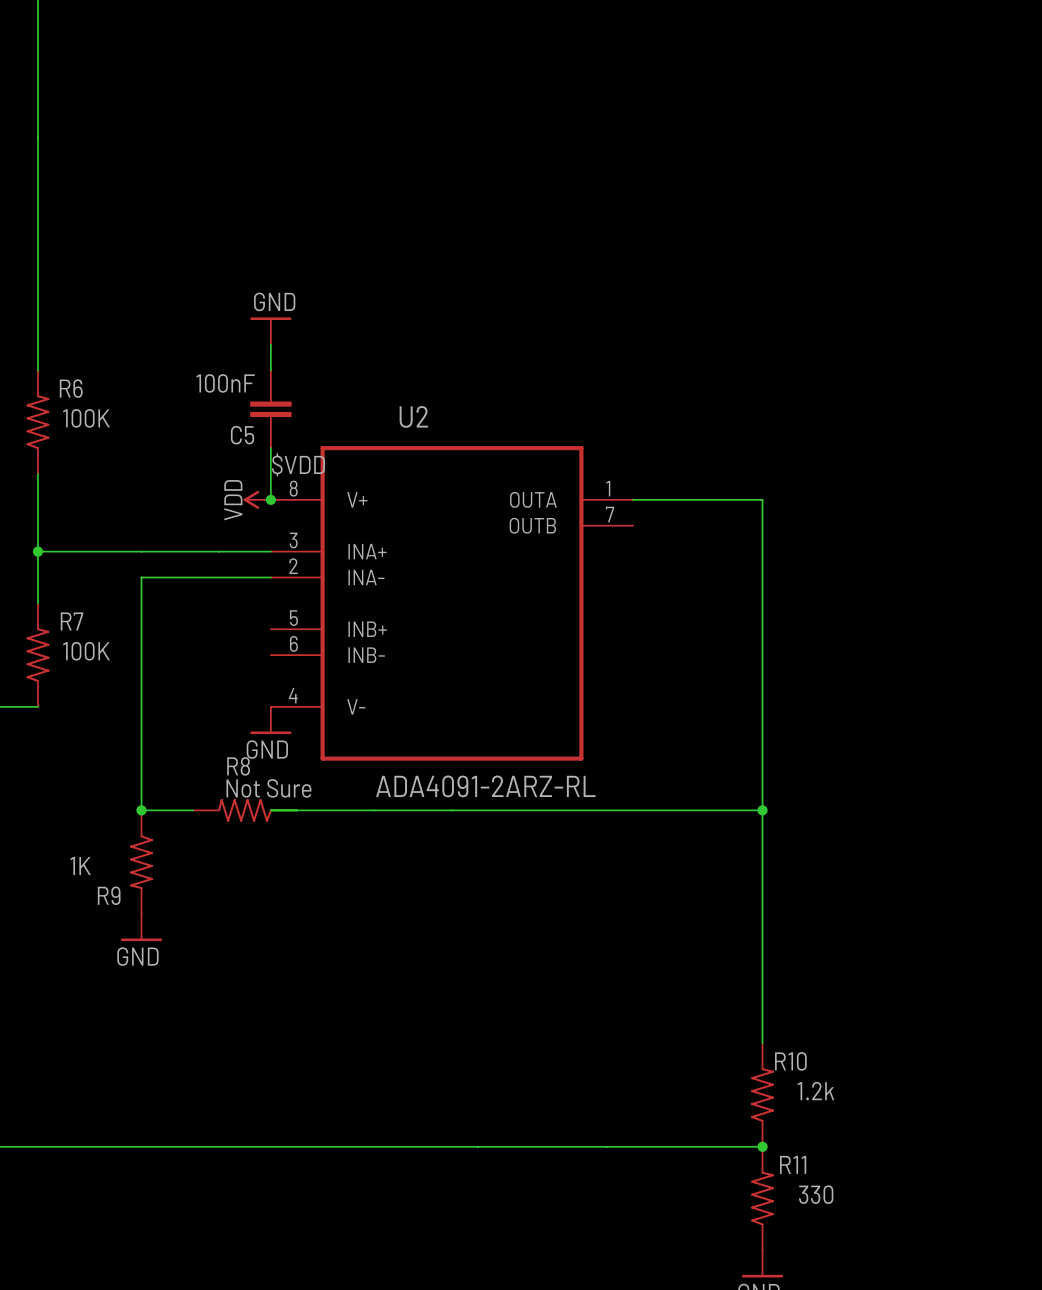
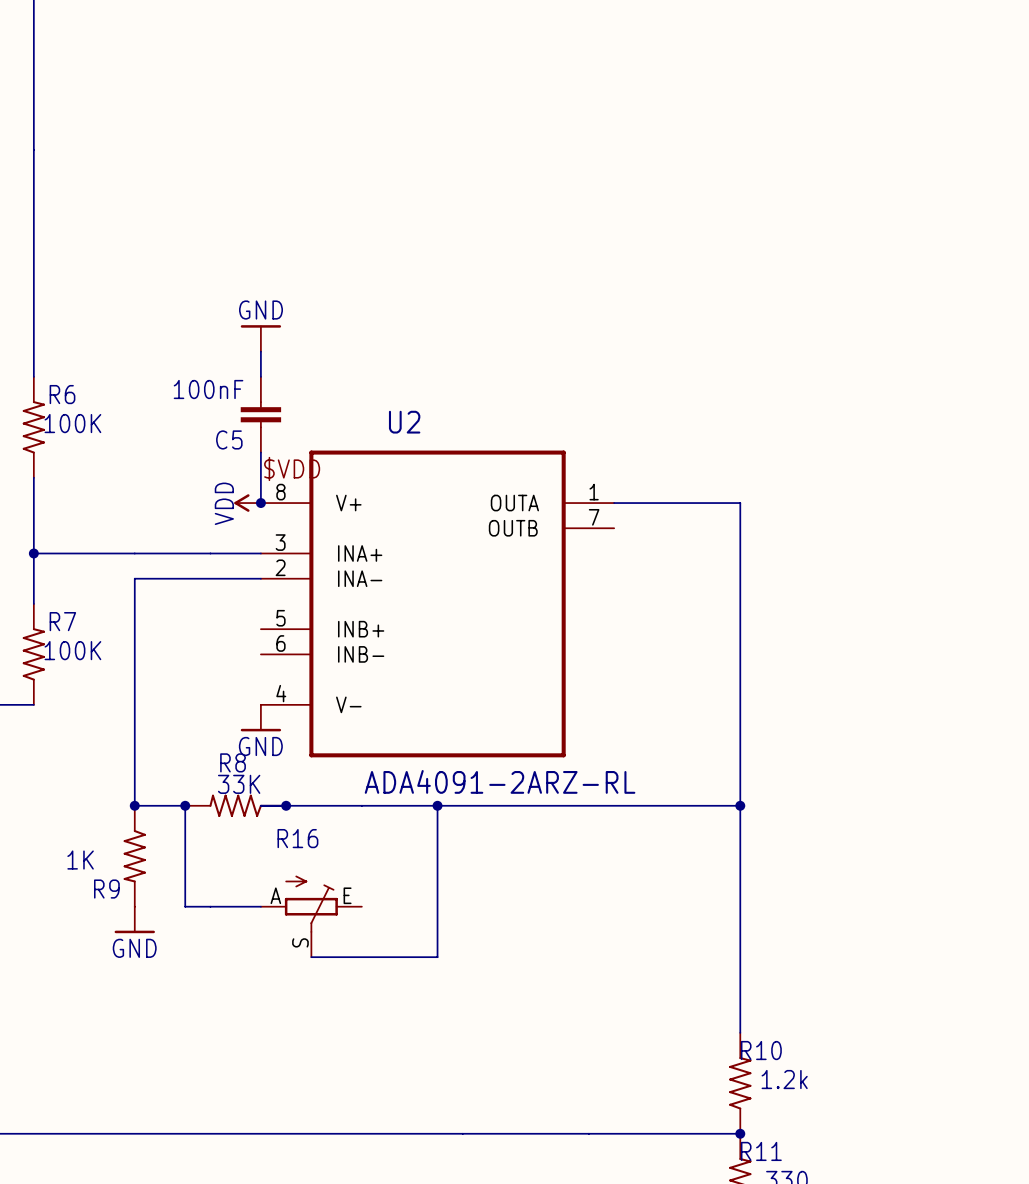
R8 value: Not Sure (268, 788) -> 33K (239, 784)
wire: none -> (185, 805) (185, 906) (260, 906)
junction: none -> (185, 805)
junction: none -> (286, 805)
wire: none -> (437, 805) (437, 957) (311, 957)
junction: none -> (437, 805)
R16: none -> (311, 916)

